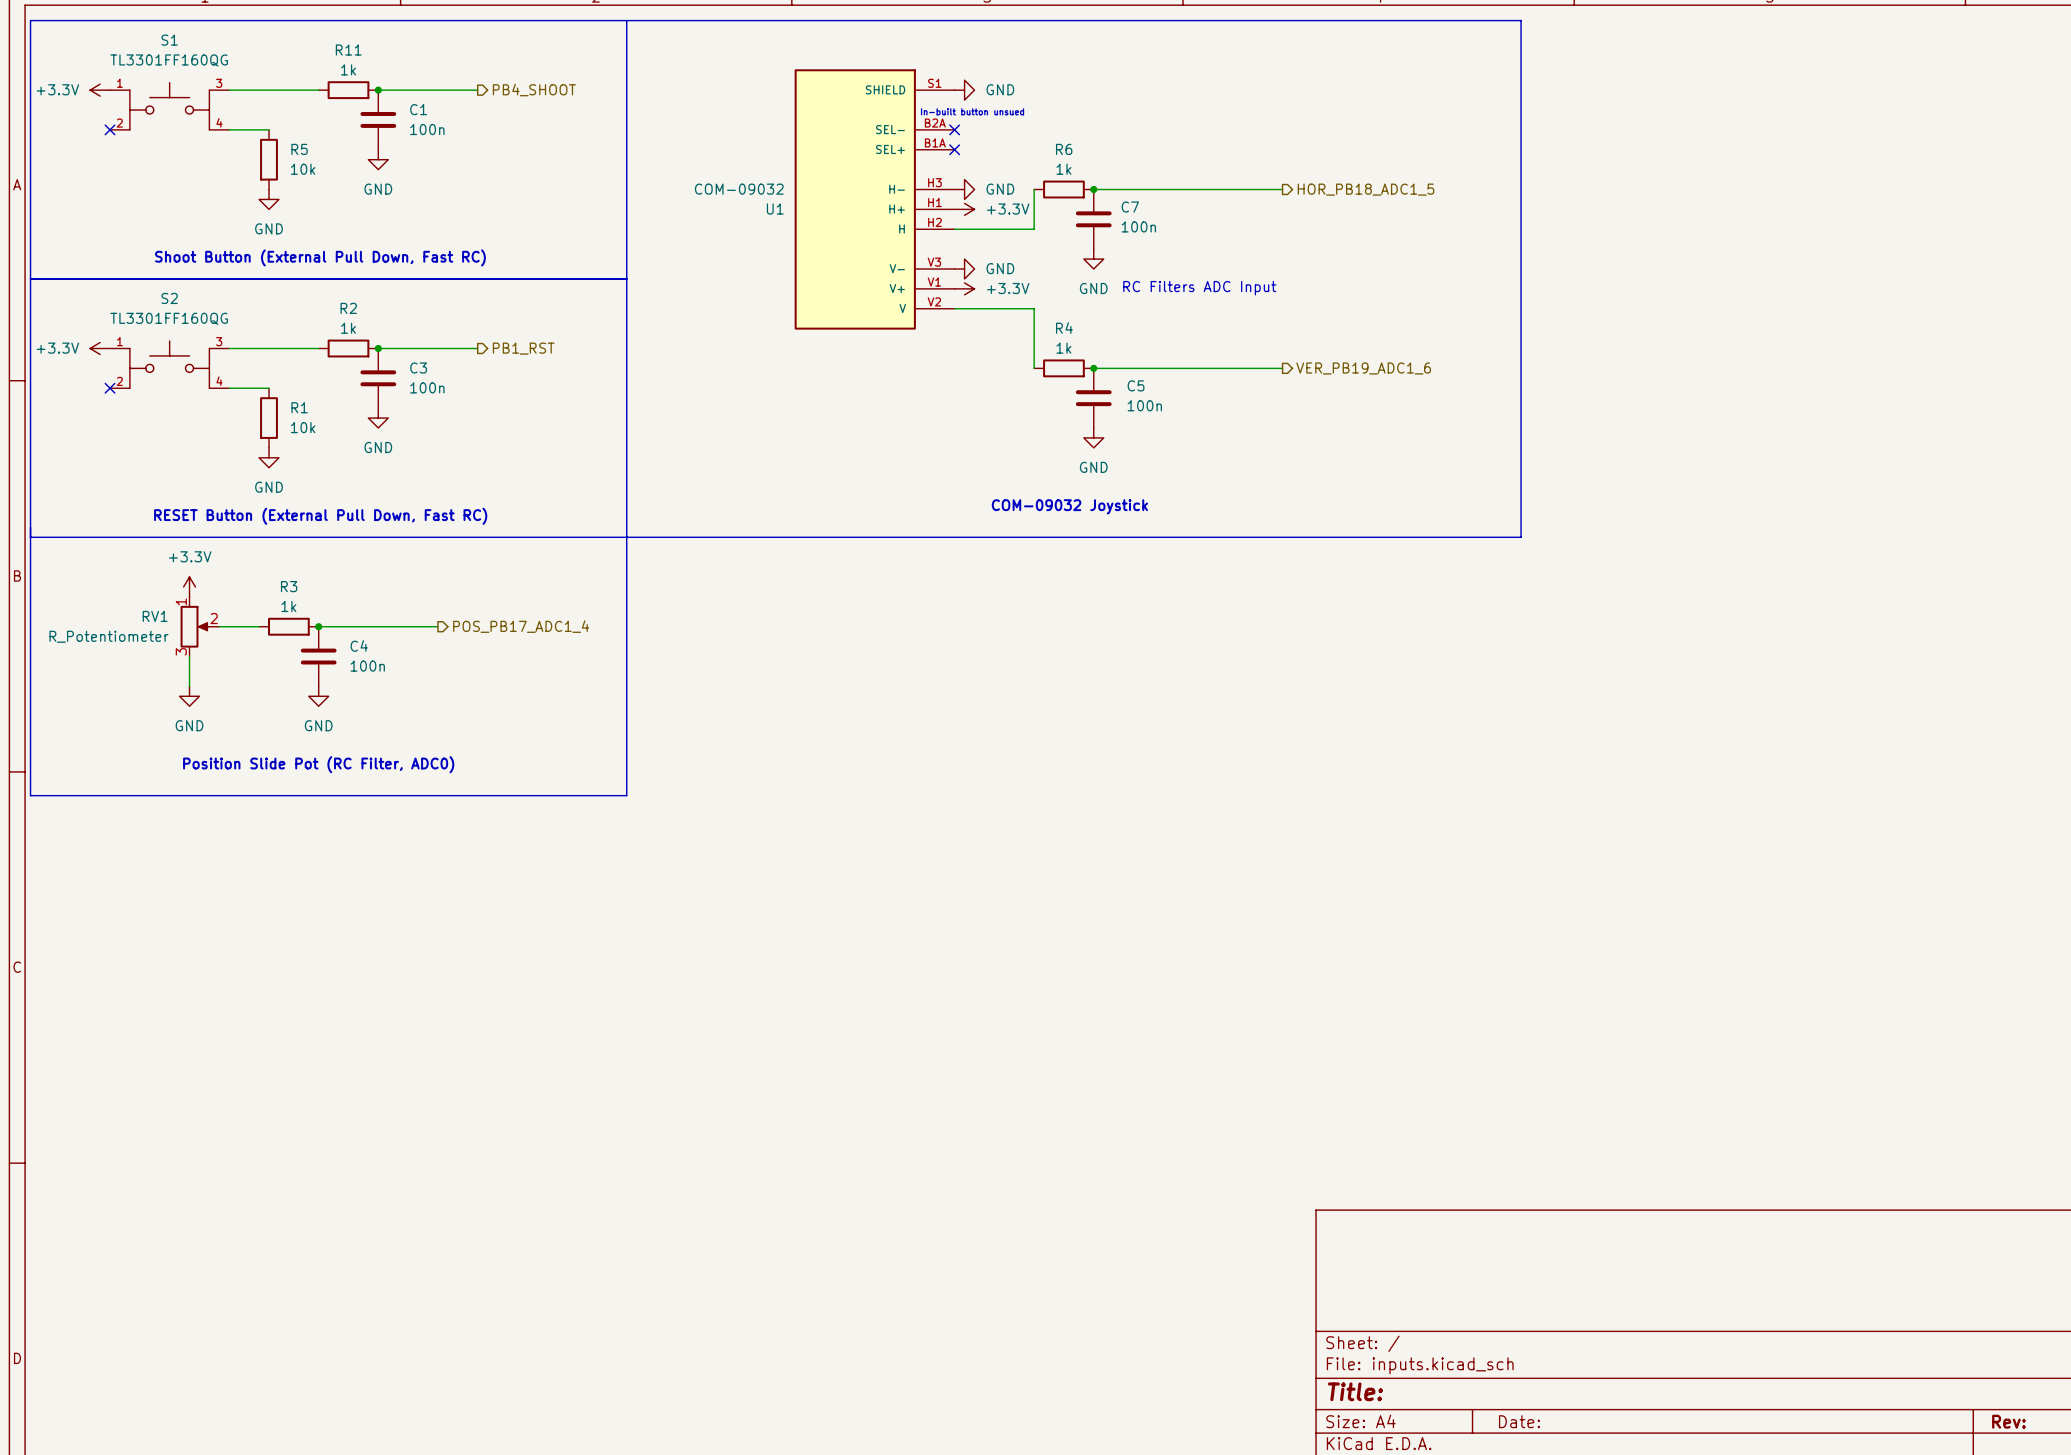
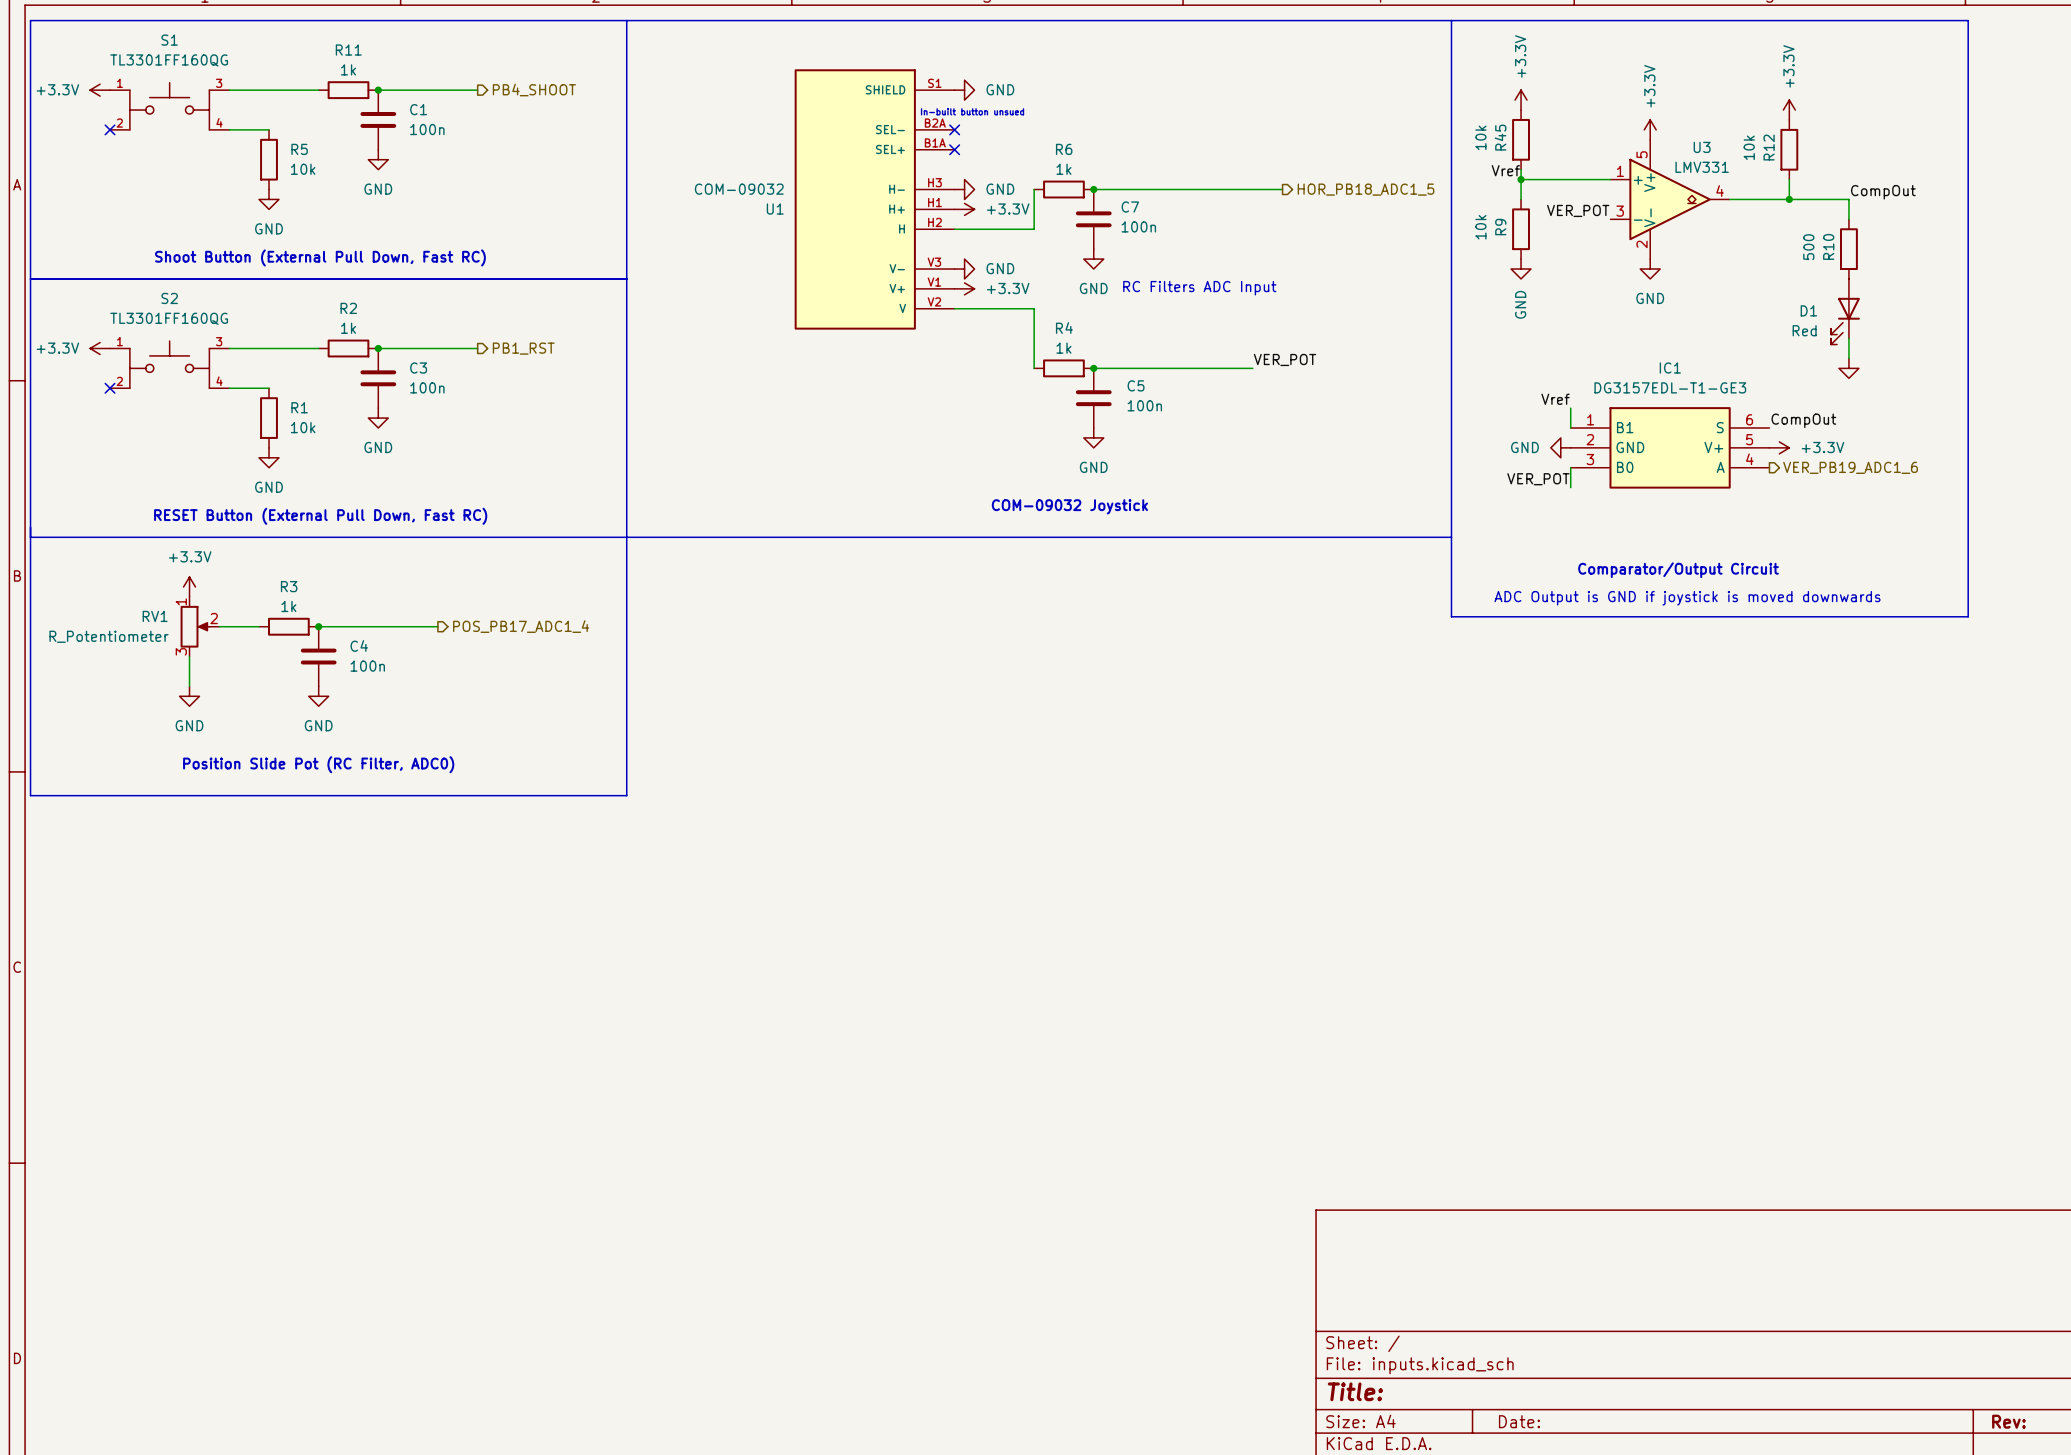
line: (1521, 20) (1521, 537) (1451, 537) -> (1521, 20) (1968, 20) (1968, 616) (1451, 616) (1451, 20)
power symbol: none -> +3.3V (1521, 100)
power symbol: none -> +3.3V (1789, 110)
power symbol: none -> +3.3V (1650, 129)
R45: none -> 10k (1521, 139)
R12: none -> 10k (1789, 149)
label: none -> Vref (1505, 170)
wire: none -> (1521, 179) (1610, 179)
junction: none -> (1521, 179)
wire: none -> (1789, 179) (1789, 199)
label: none -> CompOut (1883, 192)
U3: none -> LMV331 (1670, 199)
wire: none -> (1729, 199) (1848, 199) (1848, 219)
junction: none -> (1789, 199)
label: none -> VER_POT (1578, 210)
R9: none -> 10k (1521, 229)
R10: none -> 500 (1848, 249)
power symbol: none -> GND (1521, 269)
power symbol: none -> GND (1650, 269)
D1: none -> Red (1845, 311)
wire: none -> (1848, 338) (1848, 358)
label: none -> VER_POT (1285, 359)
wire: (1252, 368) (1282, 368) -> none
hierarchical label: VER_PB19_ADC1_6 (1363, 368) -> none
power symbol: none -> (1848, 368)
label: none -> Vref (1555, 399)
wire: none -> (1570, 408) (1570, 427)
label: none -> CompOut (1803, 420)
power symbol: none -> GND (1560, 447)
IC1: none -> DG3157EDL-T1-GE3 (1670, 447)
power symbol: none -> +3.3V (1779, 447)
wire: none -> (1570, 467) (1570, 487)
hierarchical label: none -> VER_PB19_ADC1_6 (1850, 467)
label: none -> VER_POT (1538, 479)
text: none -> Comparator/Output Circuit (1678, 570)
text: none -> ADC Output is GND if joystick is moved downwards (1687, 598)

